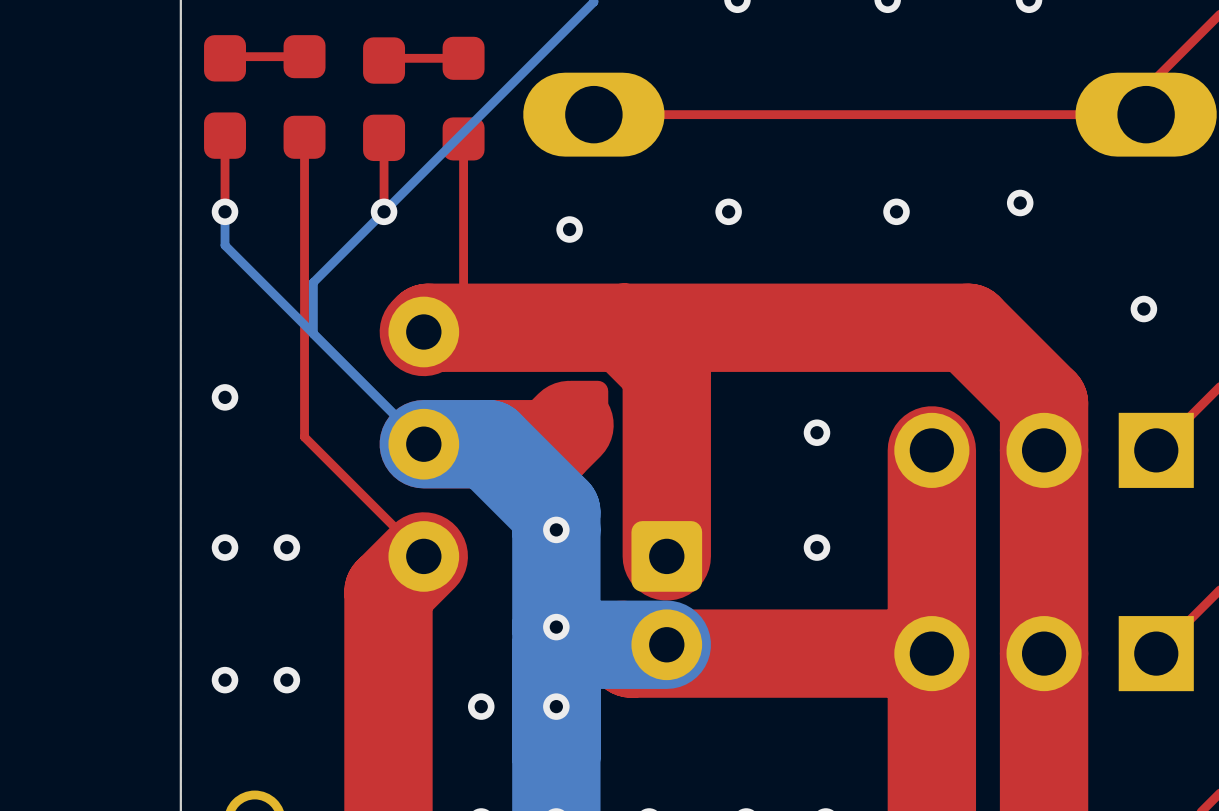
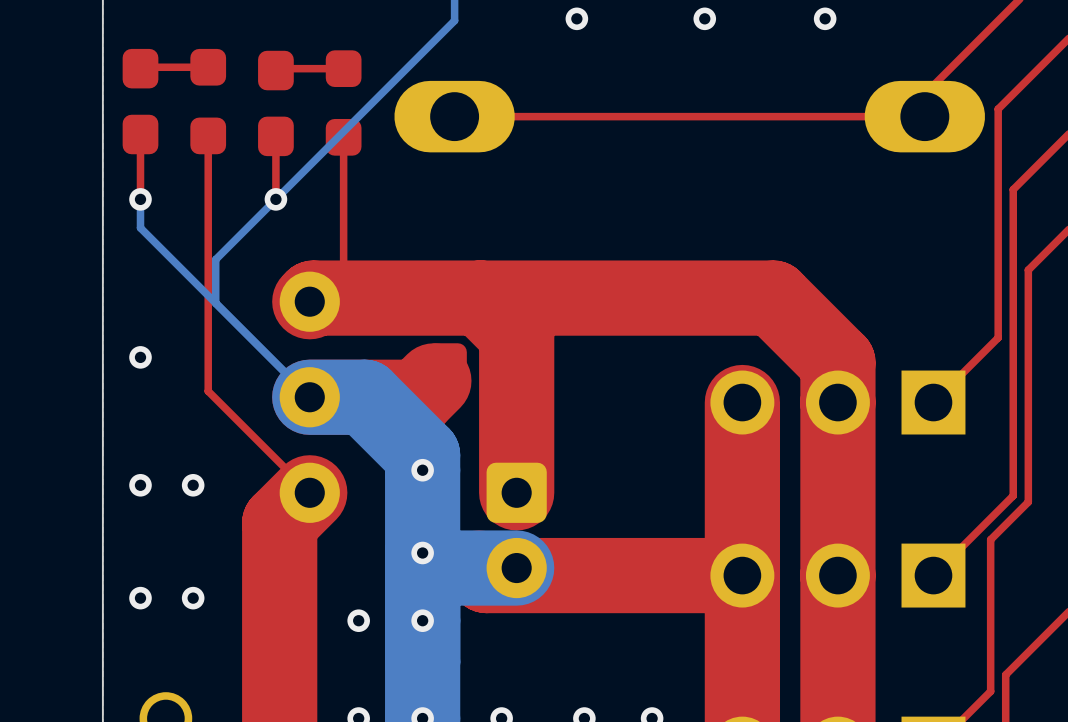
via: (1020, 203) -> none
via: (728, 211) -> none
via: (896, 211) -> none
via: (569, 229) -> none
via: (1143, 309) -> none
via: (816, 432) -> none
via: (816, 547) -> none

